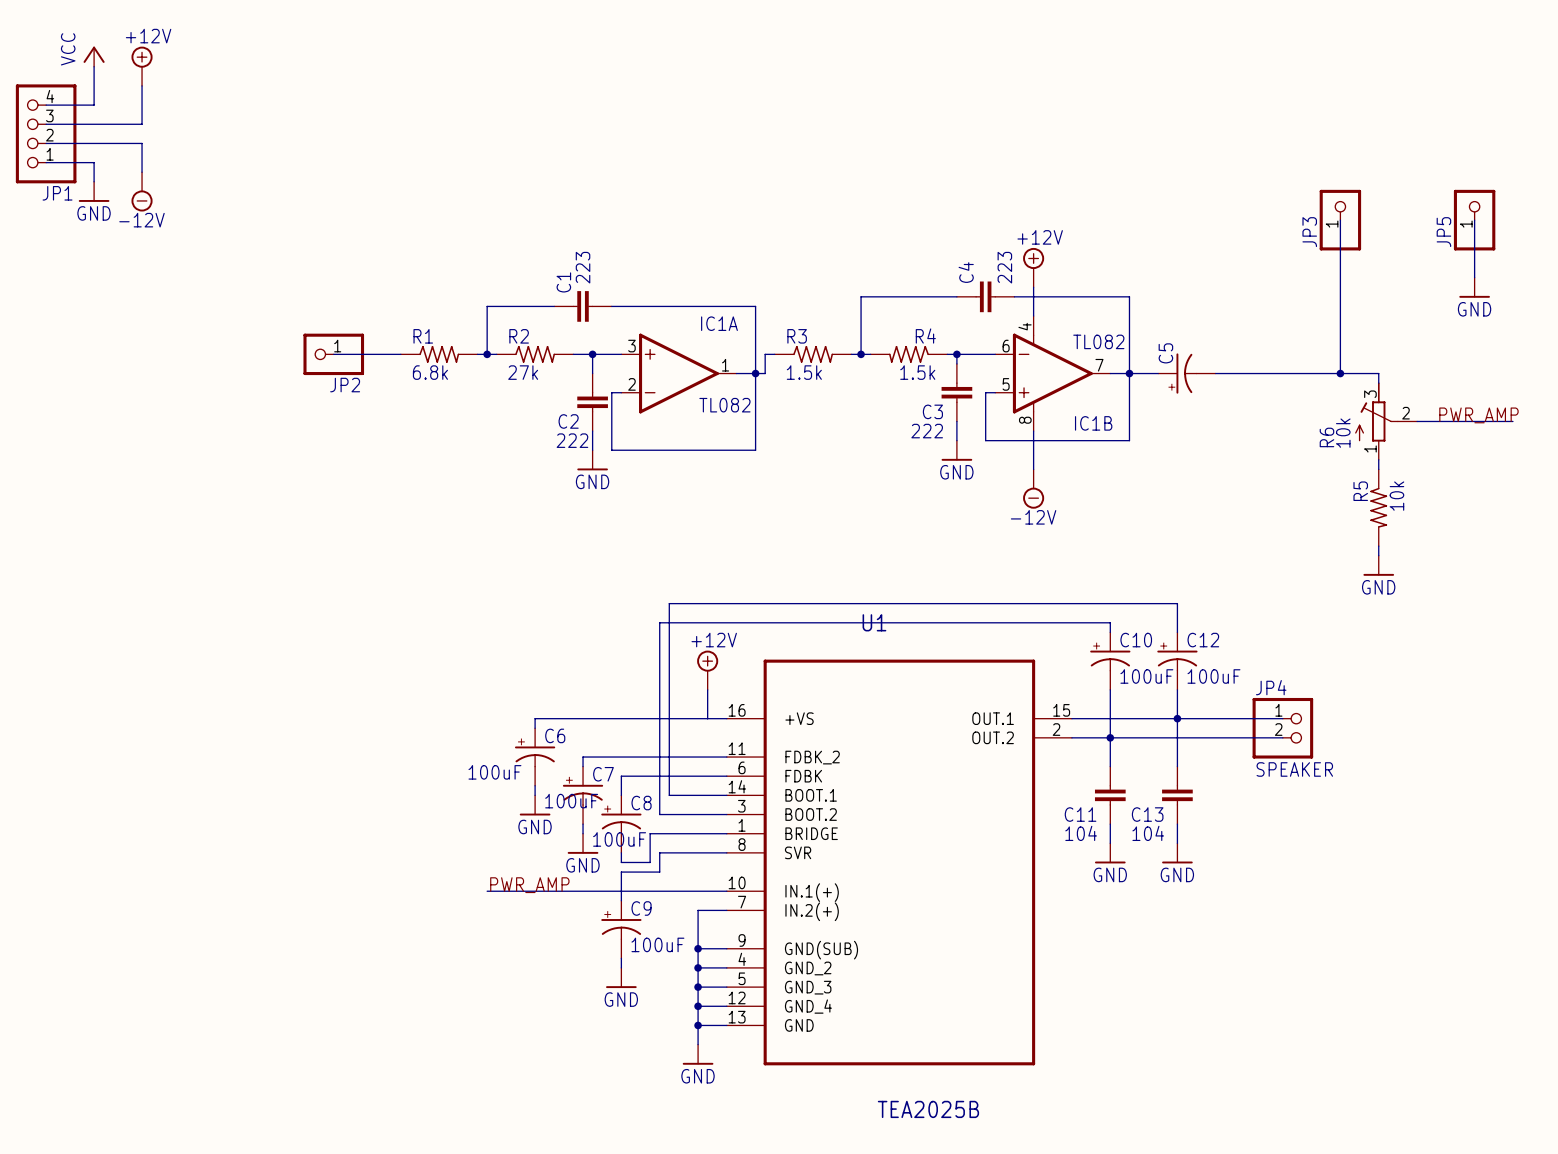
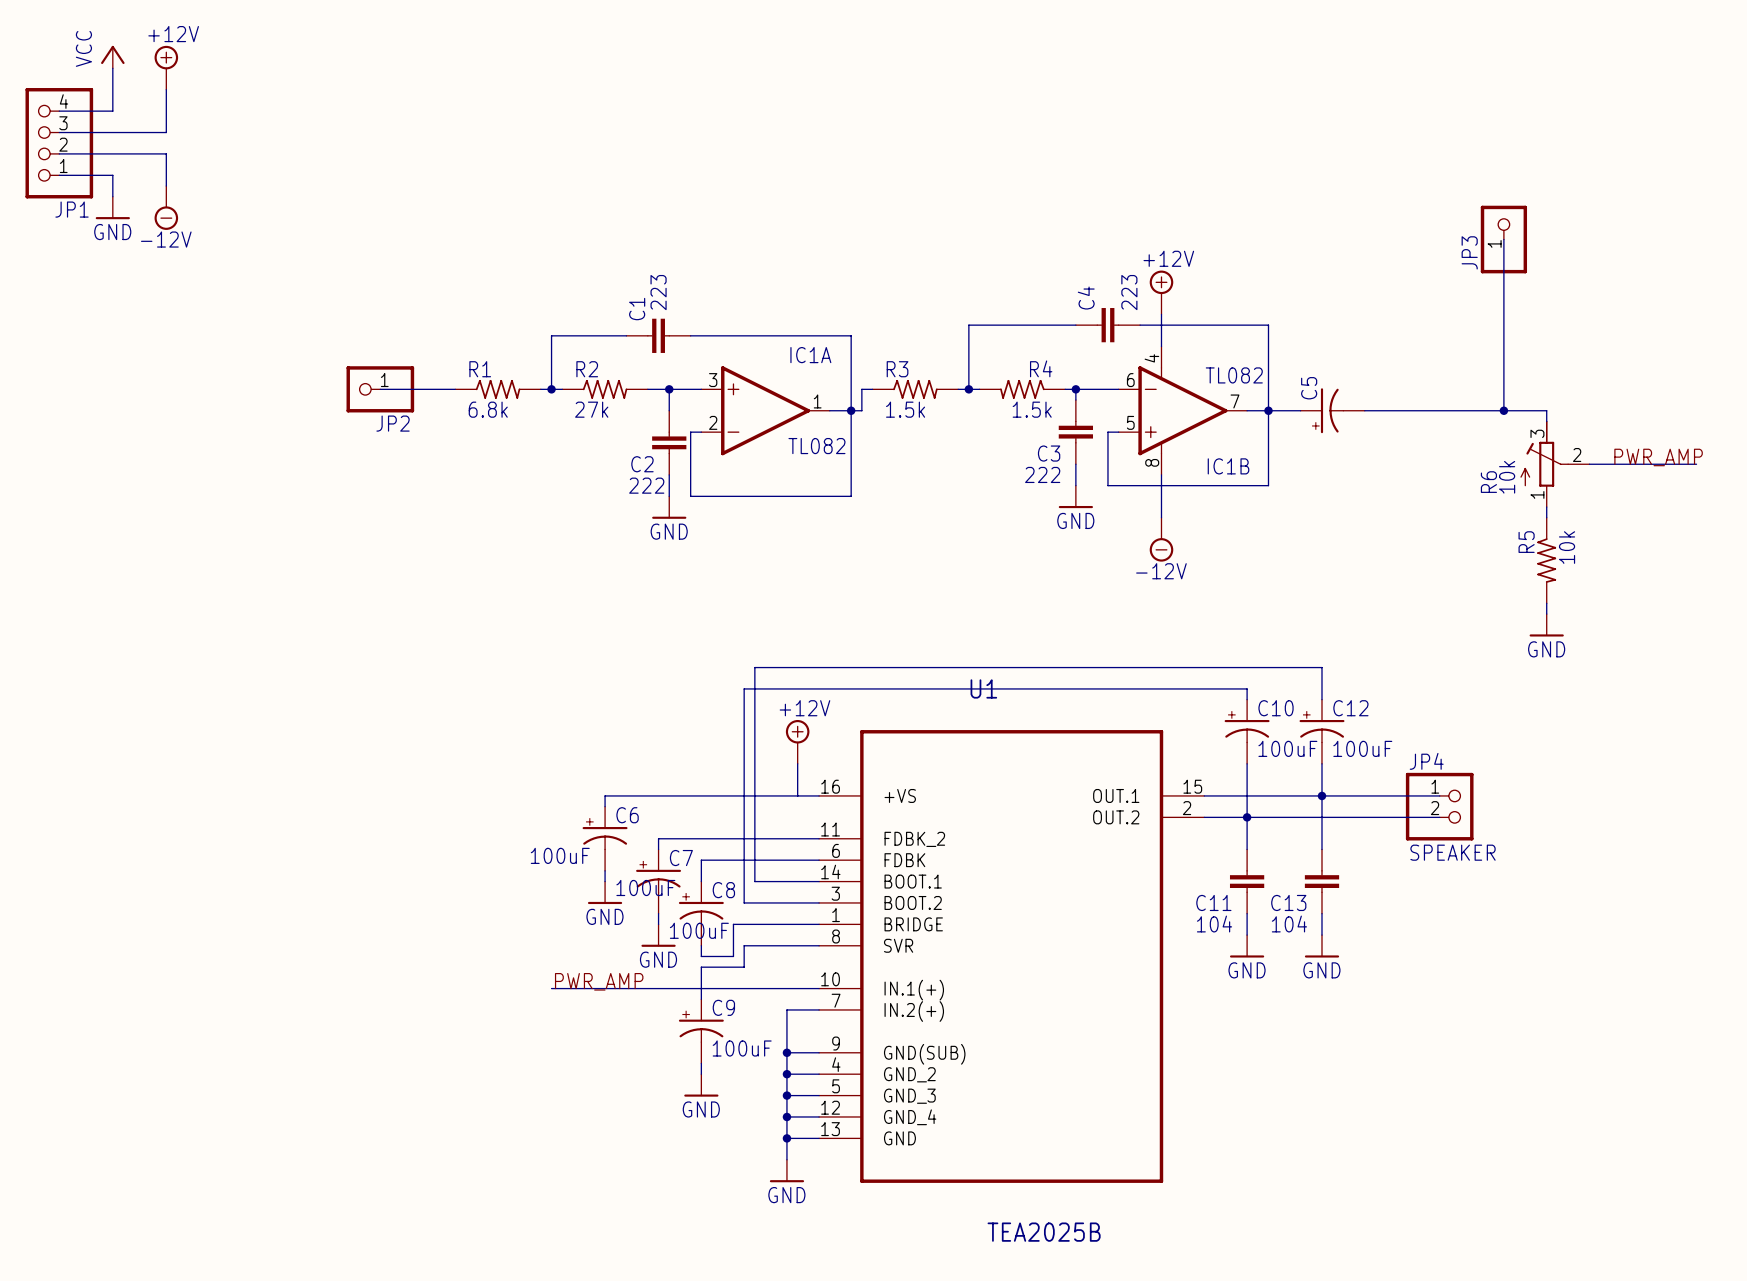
wire: (1474, 220) (1474, 277) -> none
JP5: (1474, 220) -> none
power symbol: GND (1474, 287) -> none

